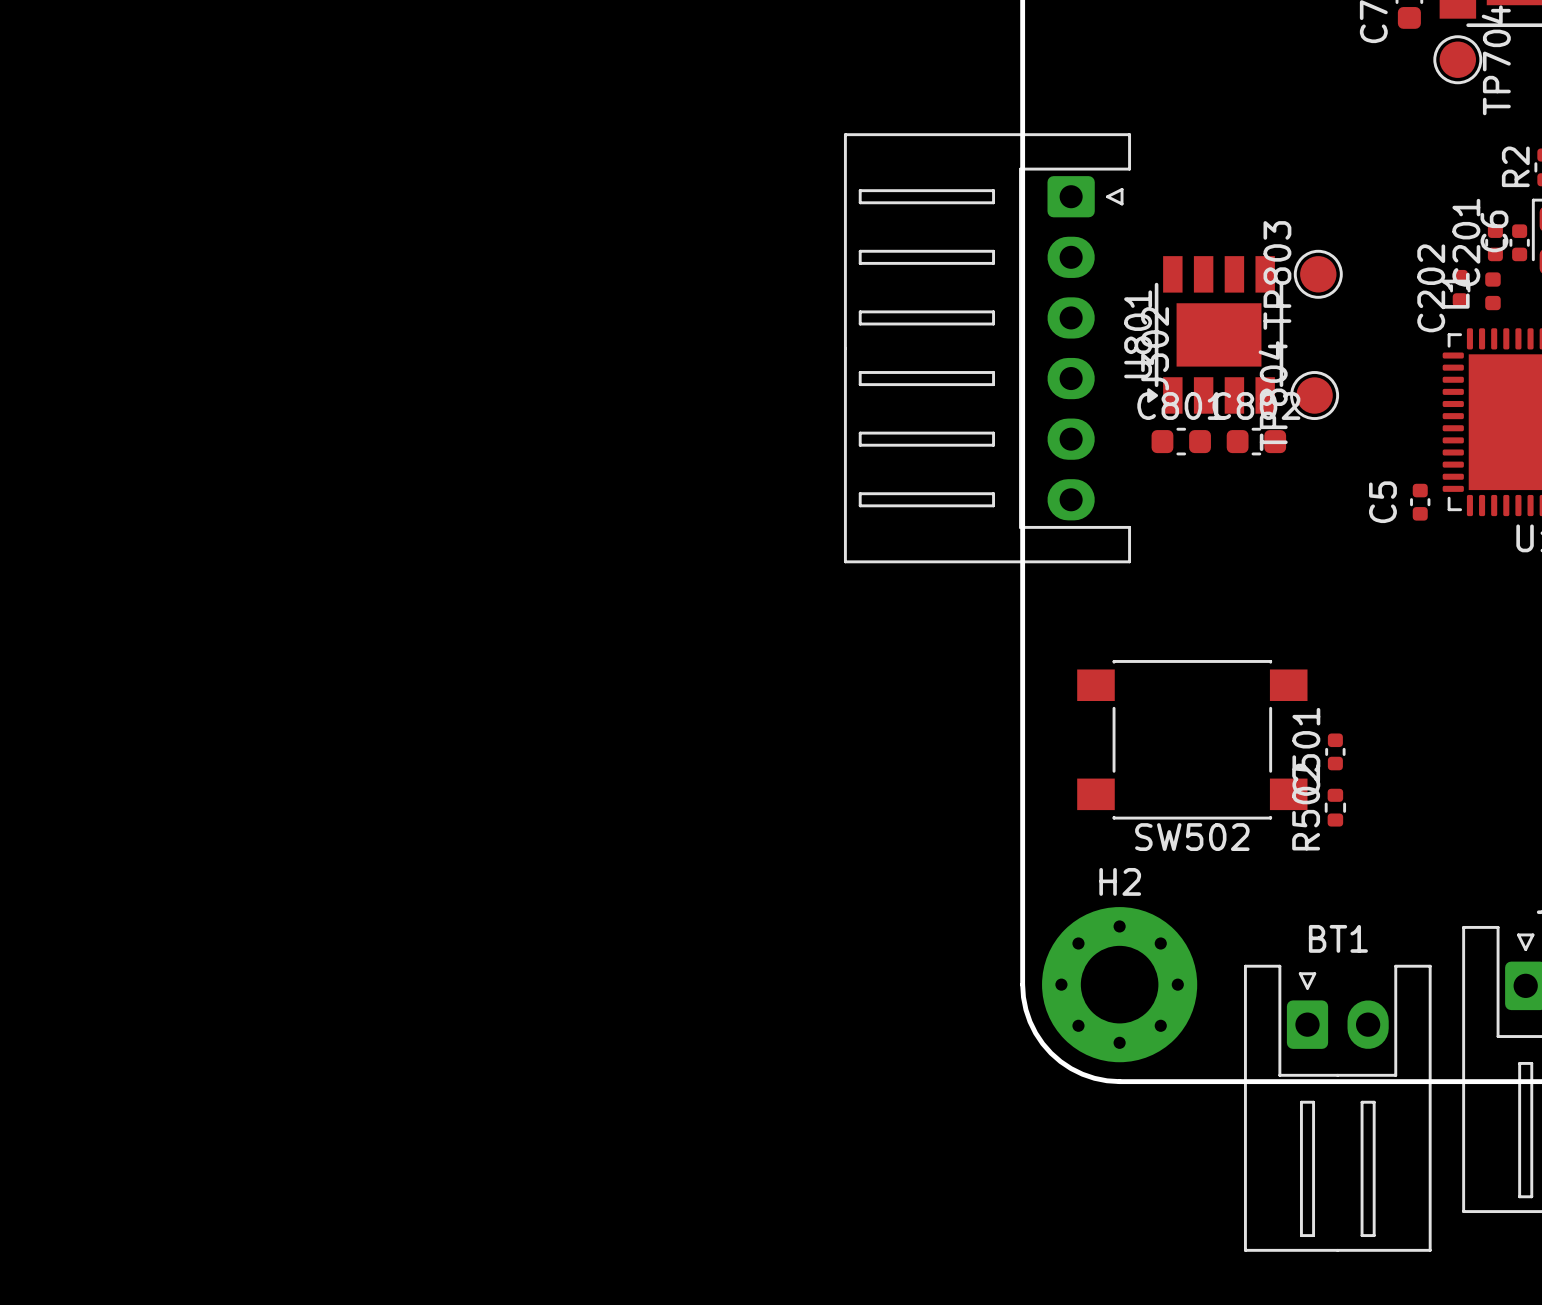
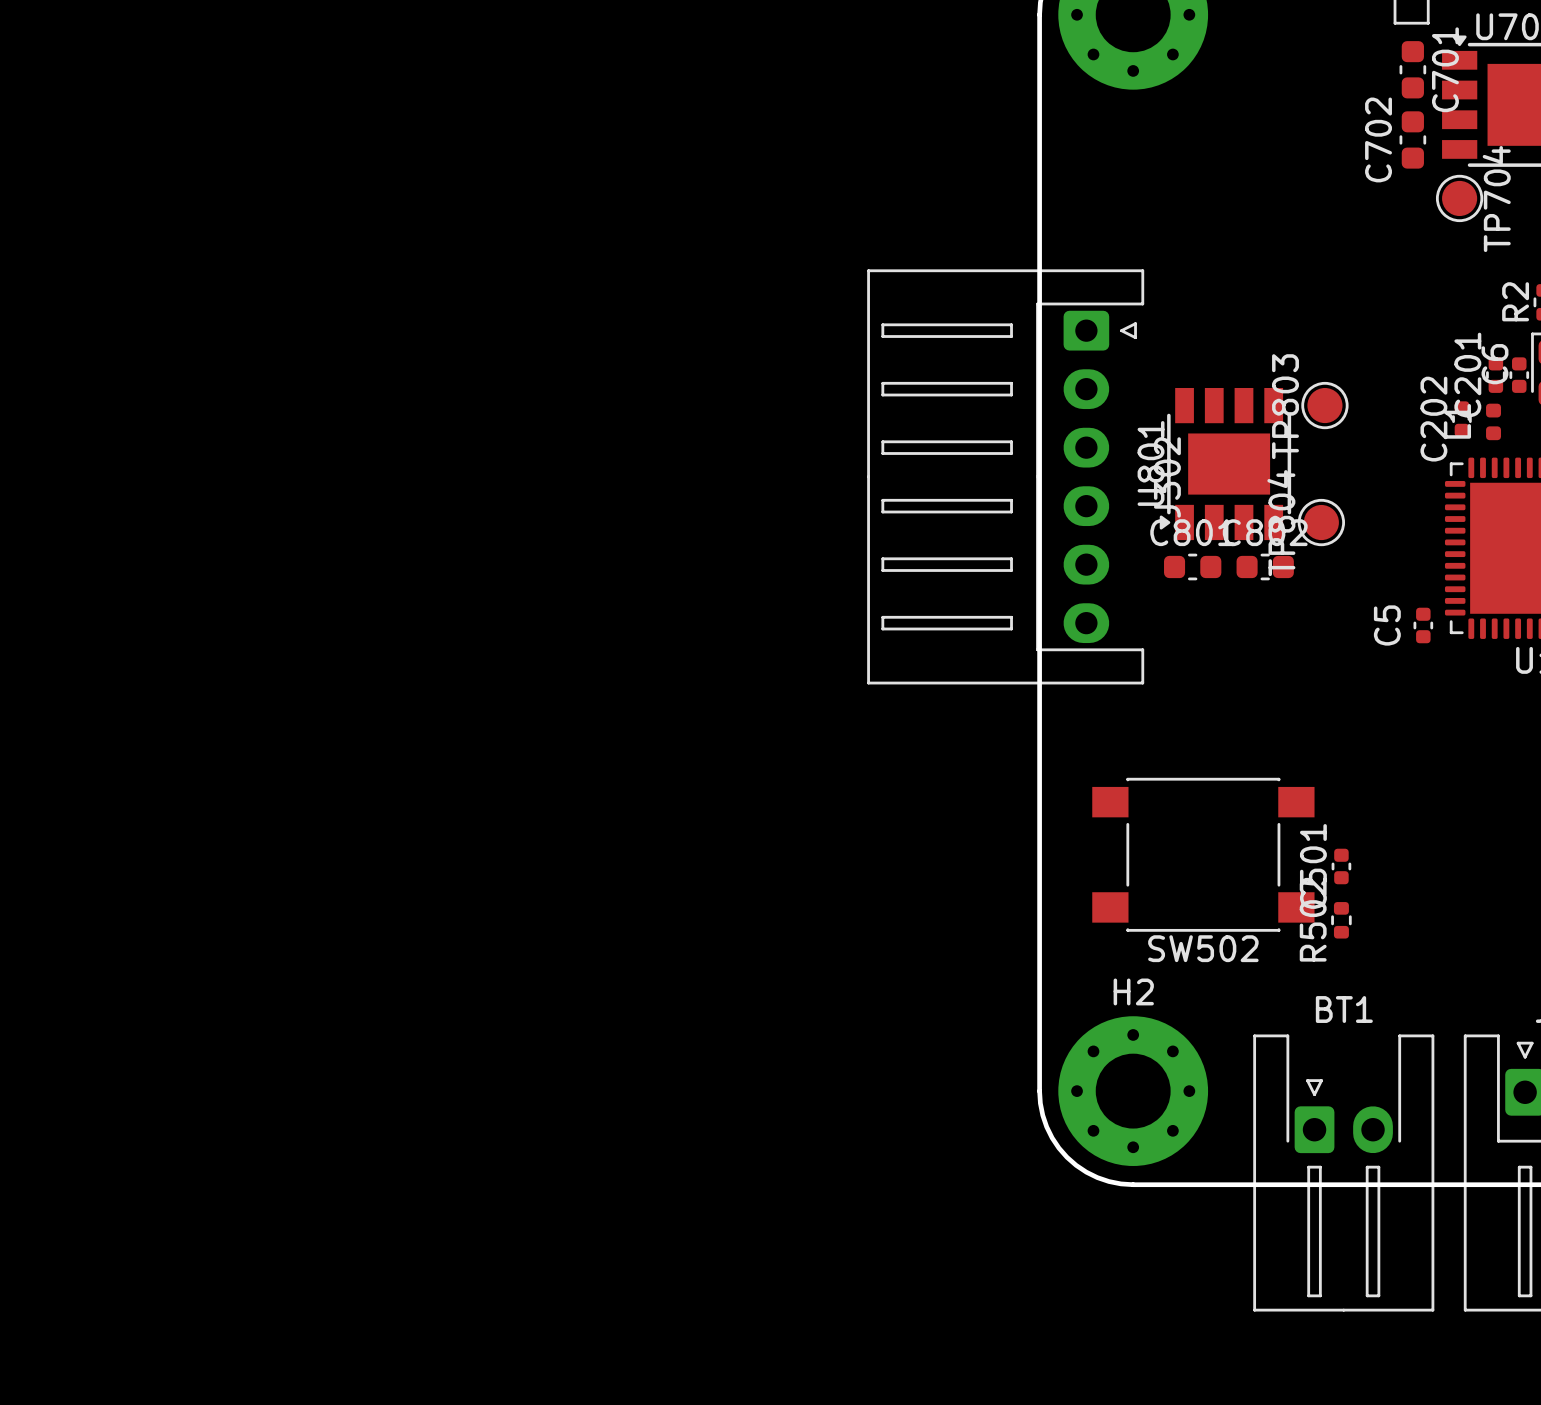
BT1 footprint: [1243, 964, 1432, 1252] -> [1253, 1034, 1435, 1312]

